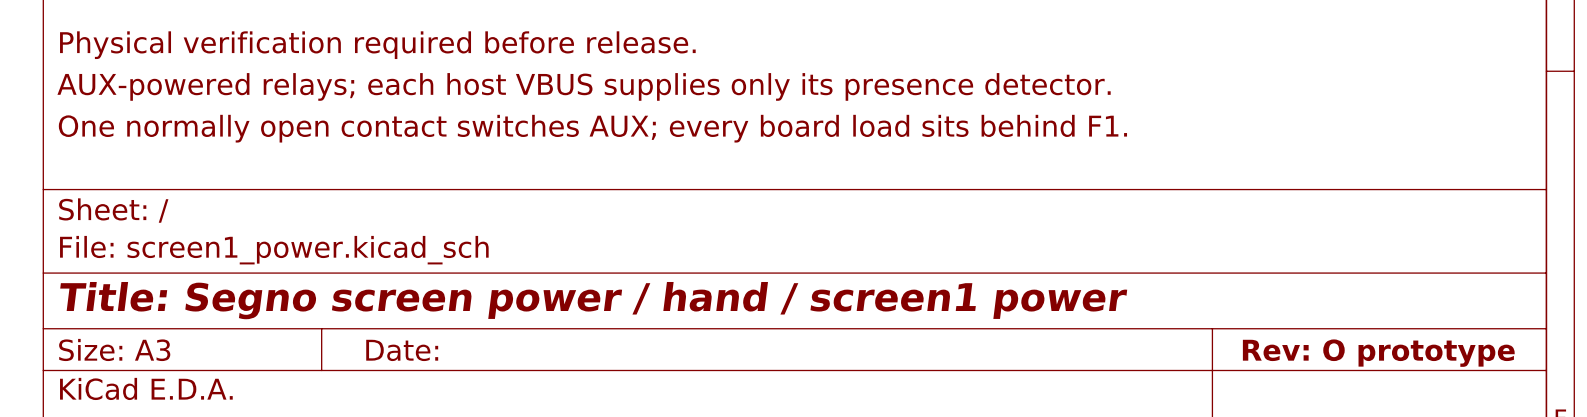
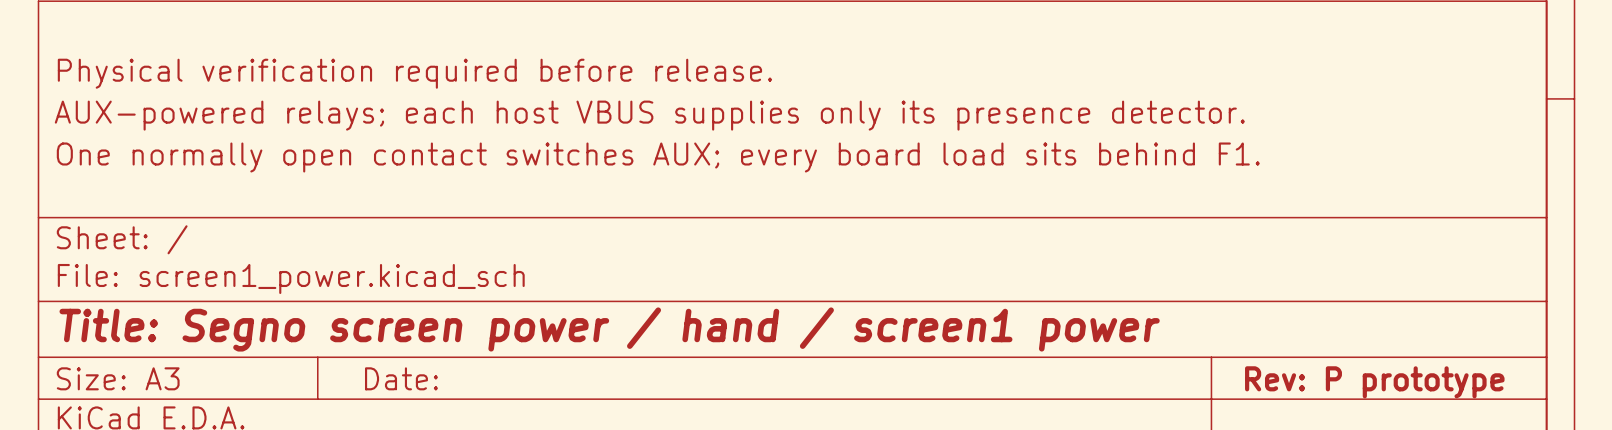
title block: Rev: O prototype (1378, 353) -> Rev: P prototype (1374, 382)

